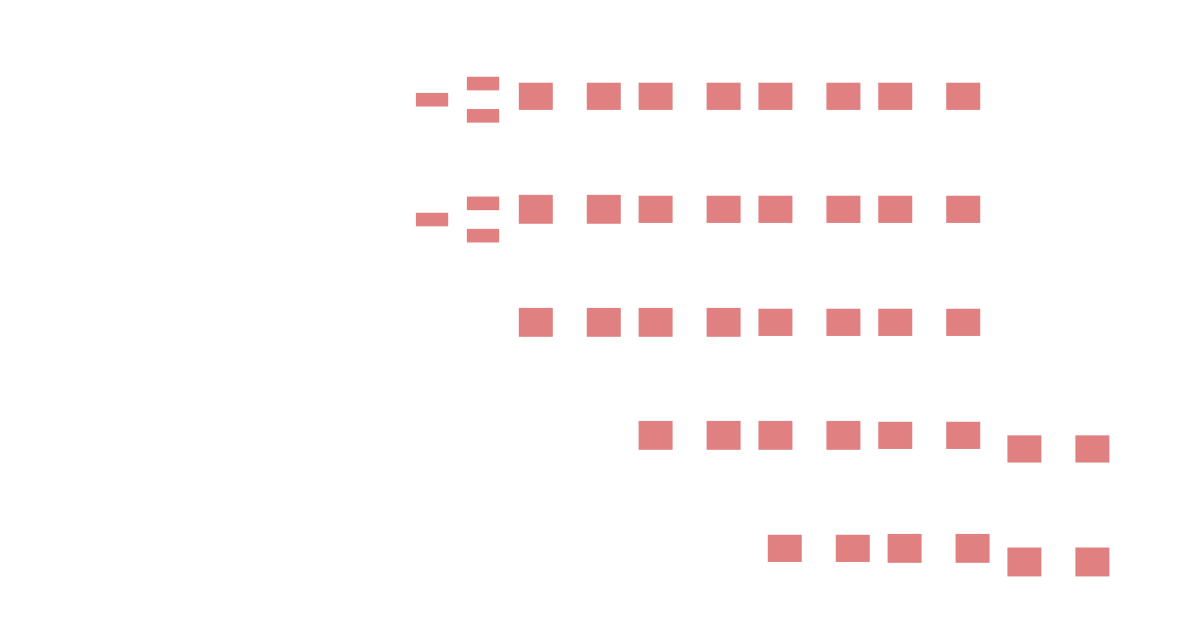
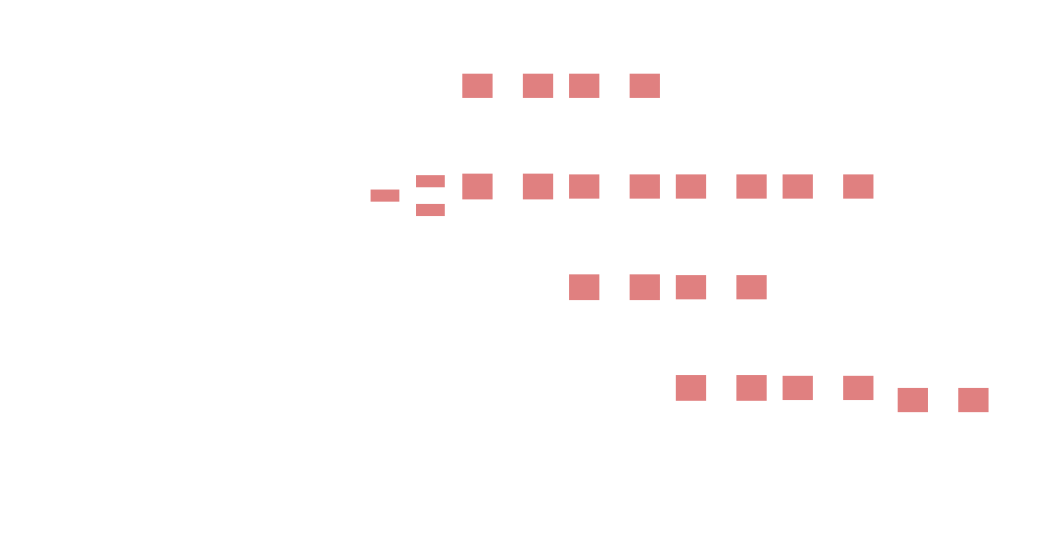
part: (809, 96) -> none
part: (929, 96) -> none
part: (457, 99) -> none
part: (569, 322) -> none
part: (929, 322) -> none
part: (689, 435) -> none
part: (818, 548) -> none
part: (938, 548) -> none
part: (1058, 561) -> none

